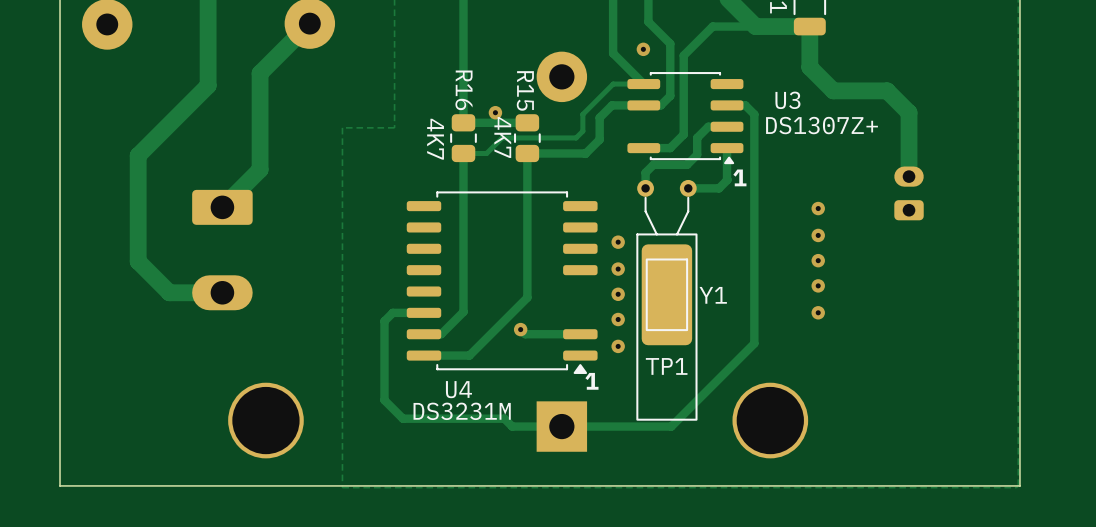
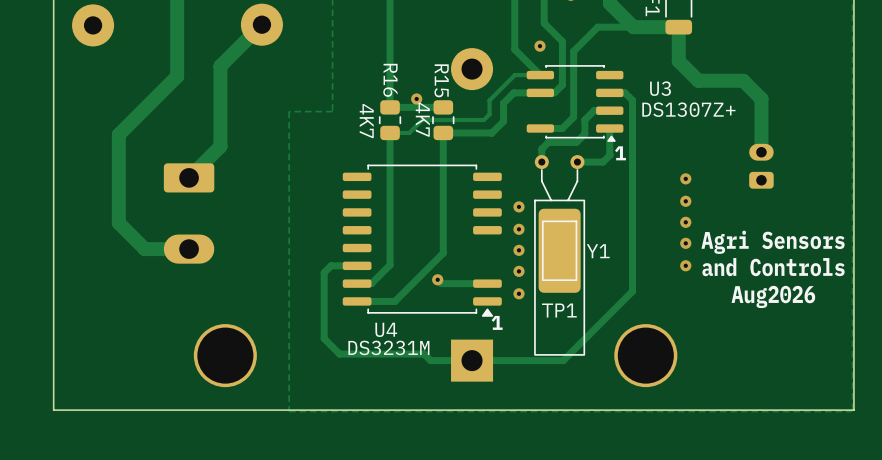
text: none -> Agri Sensors (773, 242)
text: none -> and Controls (773, 267)
text: none -> Aug2026 (773, 296)

